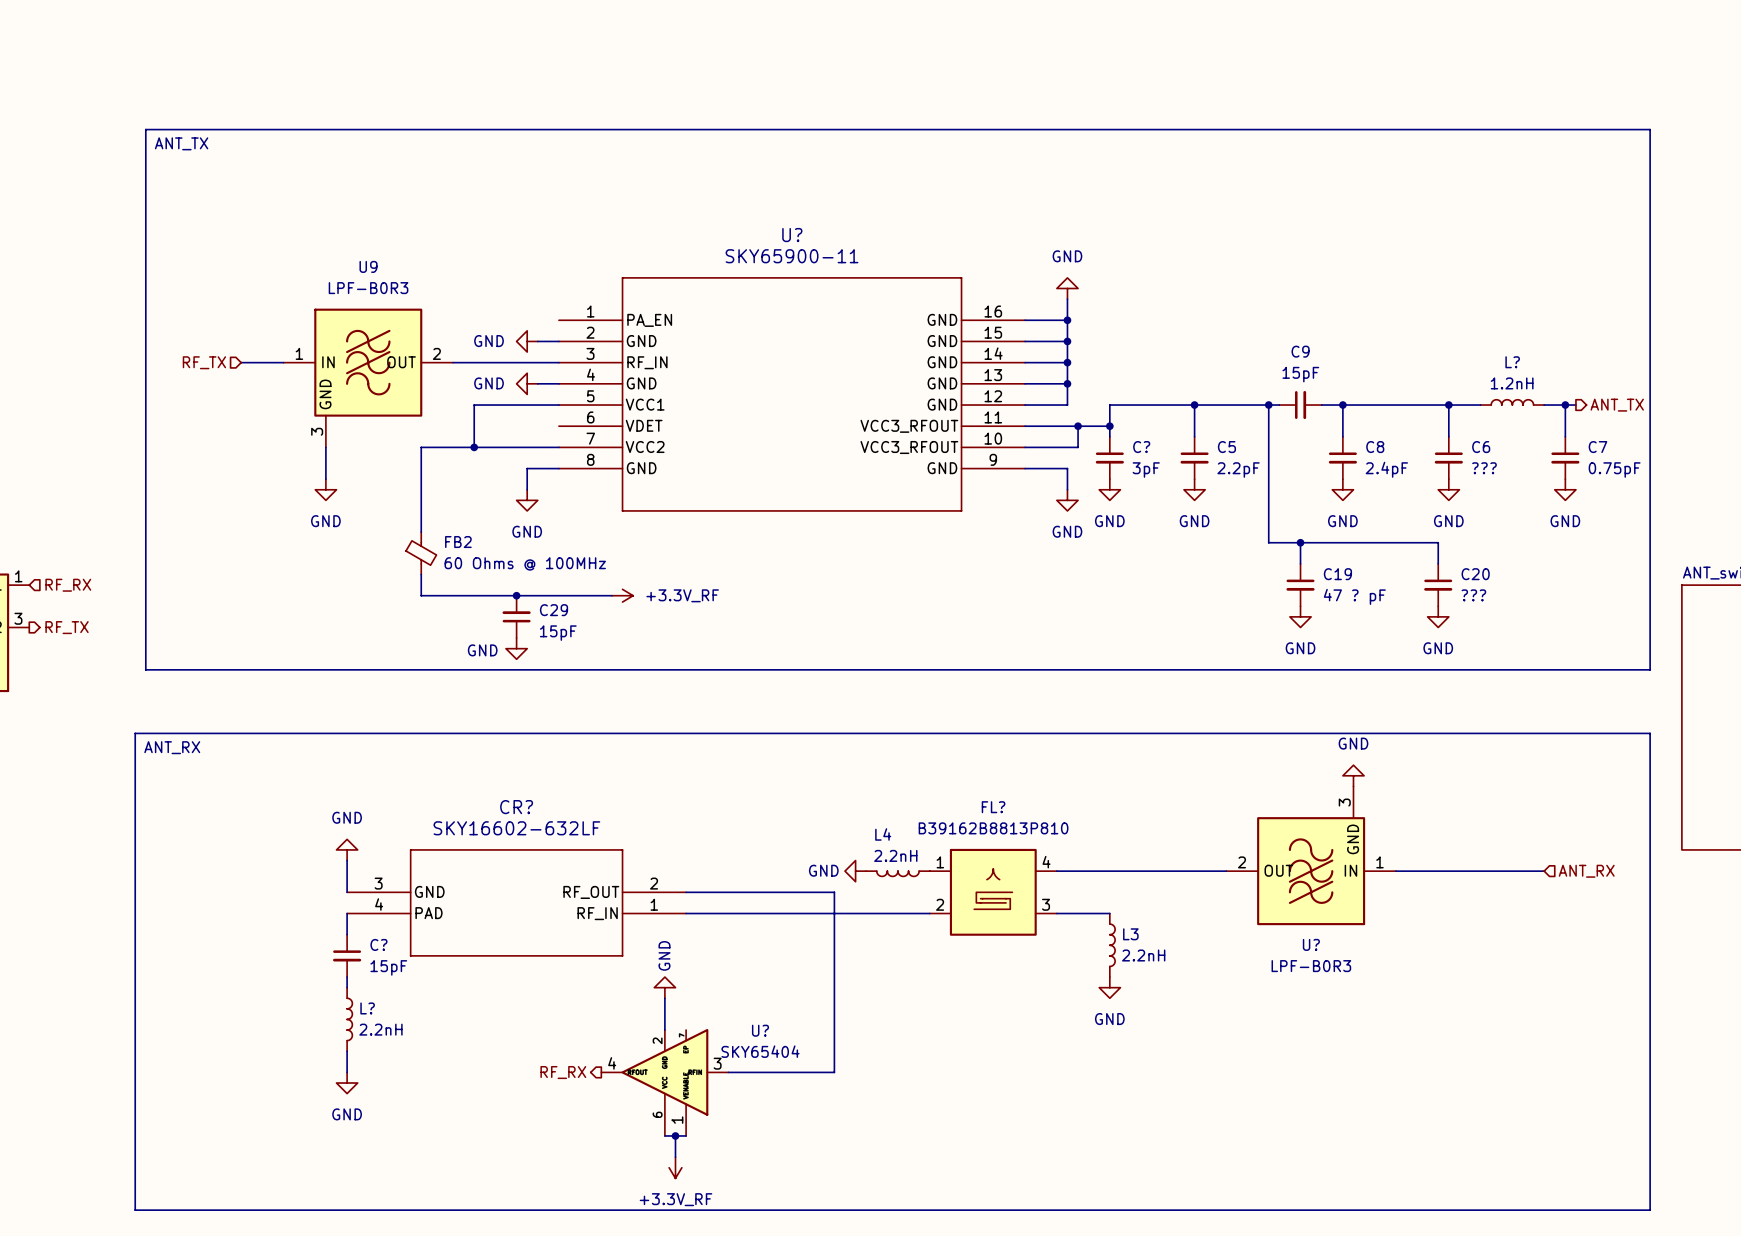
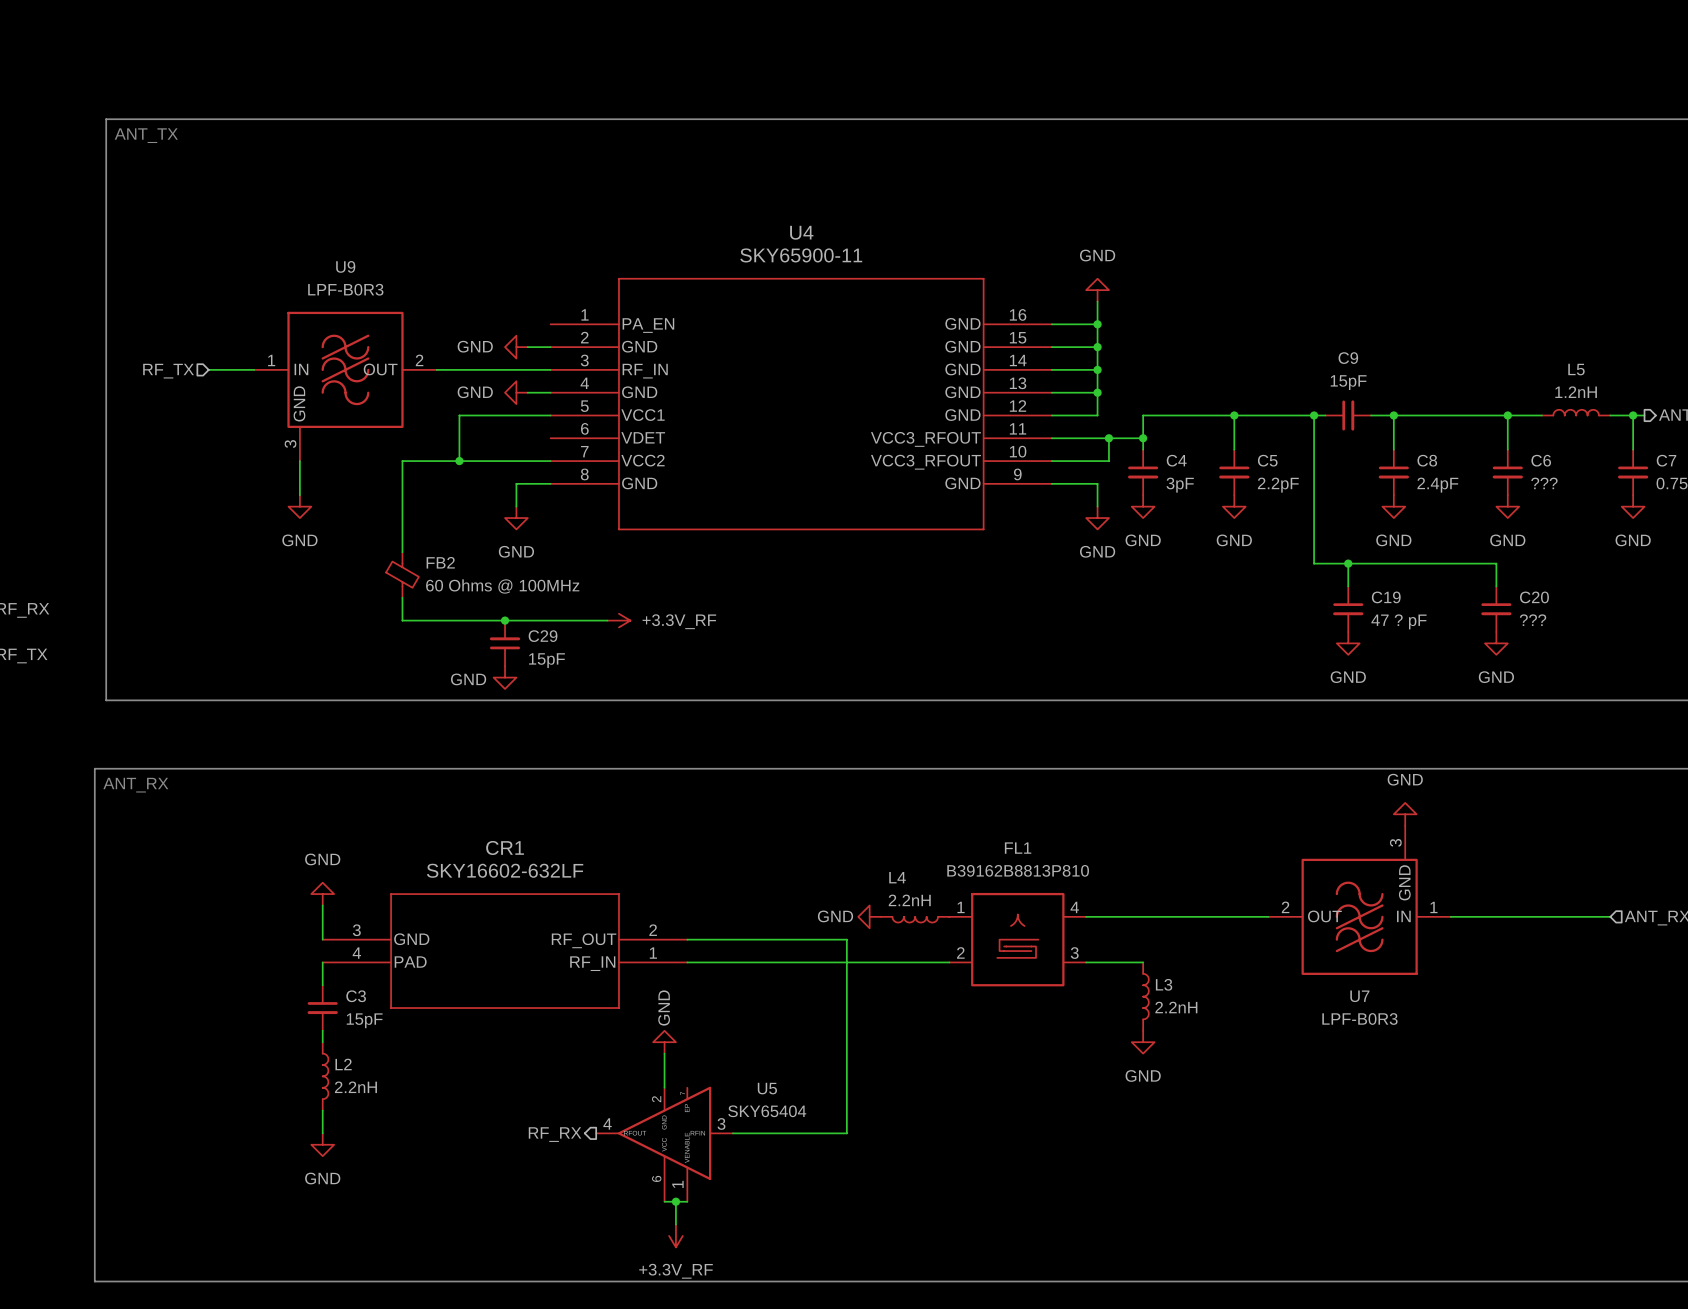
U? name: U? (792, 235) -> U4 (801, 232)
L? name: L? (1512, 362) -> L5 (1576, 369)
C? name: C? (1141, 447) -> C4 (1176, 460)
CR? name: CR? (516, 807) -> CR1 (505, 847)
FL? name: FL? (993, 807) -> FL1 (1018, 848)
C? name: C? (378, 944) -> C3 (356, 996)
U? name: U? (1311, 944) -> U7 (1359, 996)
L? name: L? (367, 1008) -> L2 (343, 1064)
U? name: U? (760, 1030) -> U5 (767, 1088)

